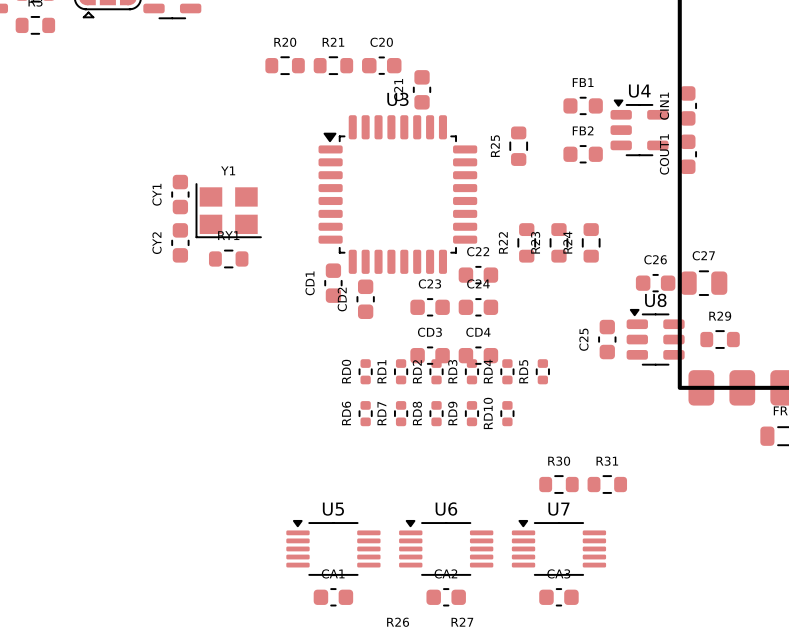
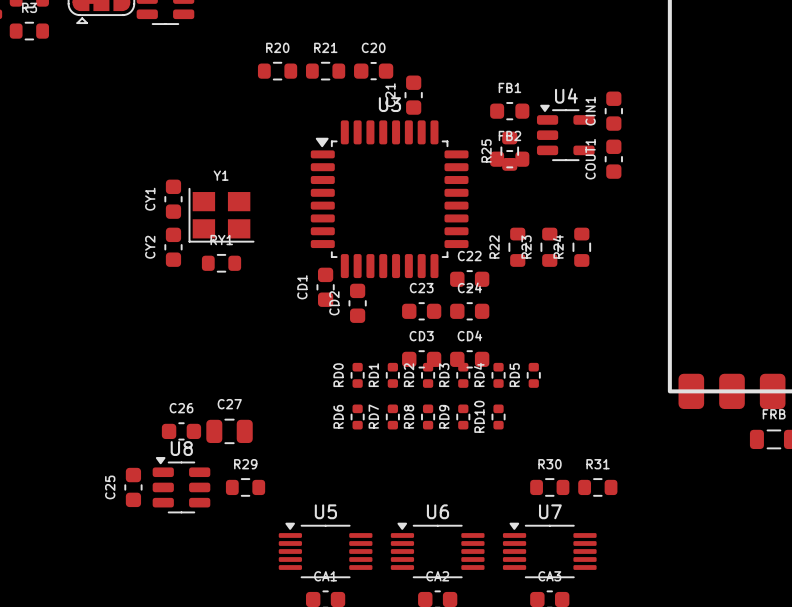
FB1 position: (583, 105) -> (509, 111)
CIN1 position: (687, 105) -> (613, 111)
U4 position: (639, 127) -> (565, 132)
FB2 position: (583, 154) -> (509, 159)
COUT1 position: (687, 154) -> (613, 159)
C26 position: (655, 283) -> (181, 431)
C27 position: (703, 283) -> (229, 431)
U8 position: (655, 337) -> (181, 485)
C25 position: (607, 339) -> (133, 487)
R29 position: (720, 339) -> (245, 487)

